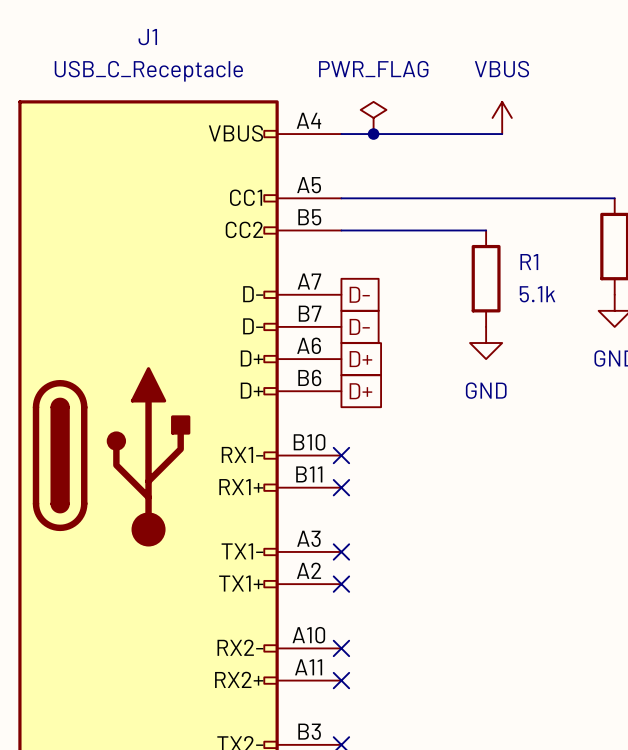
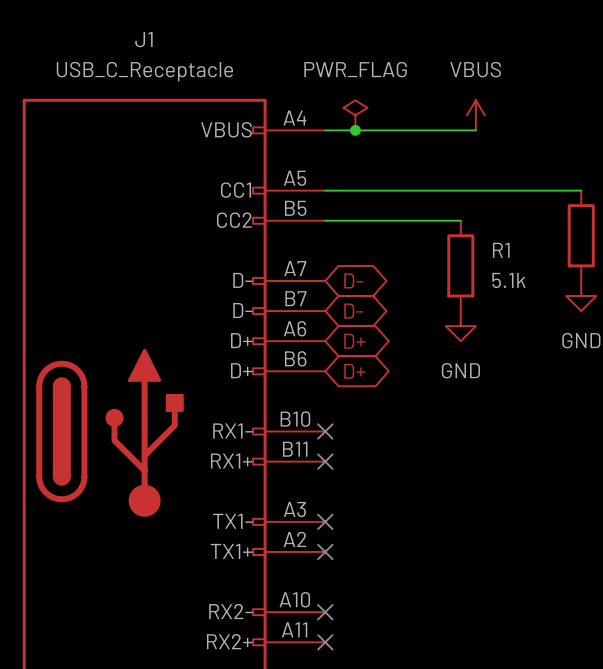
global label shape: passive (359, 294) -> bidirectional (353, 280)
global label shape: passive (359, 326) -> bidirectional (353, 311)
global label shape: passive (360, 359) -> bidirectional (354, 341)
global label shape: passive (360, 391) -> bidirectional (354, 371)

